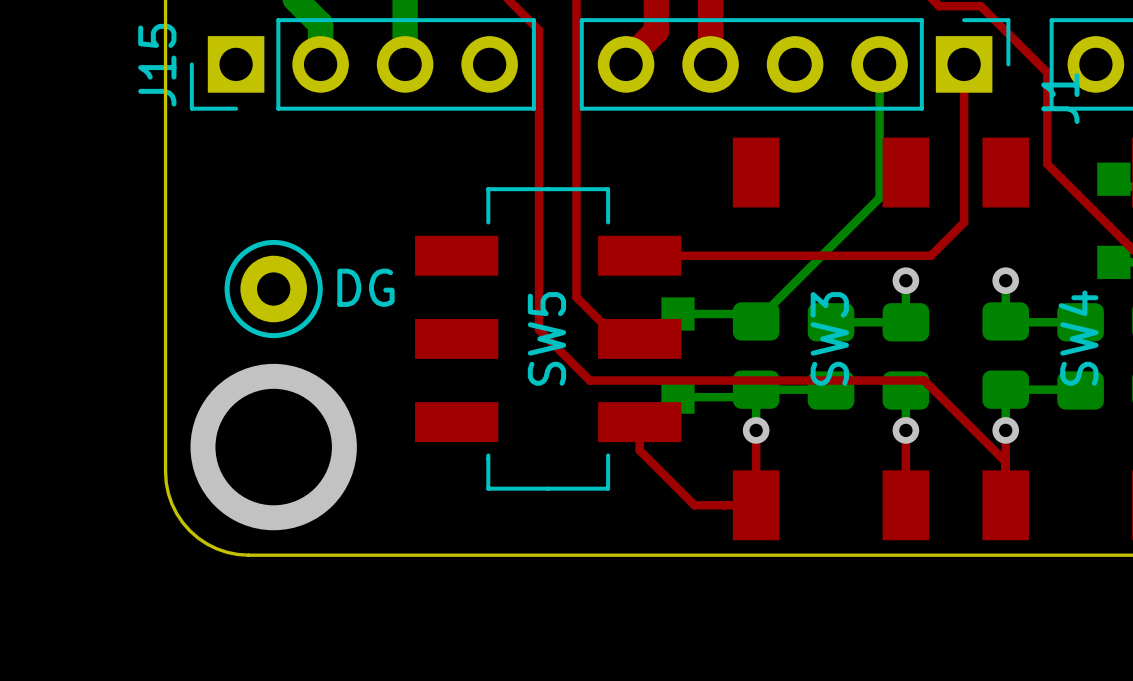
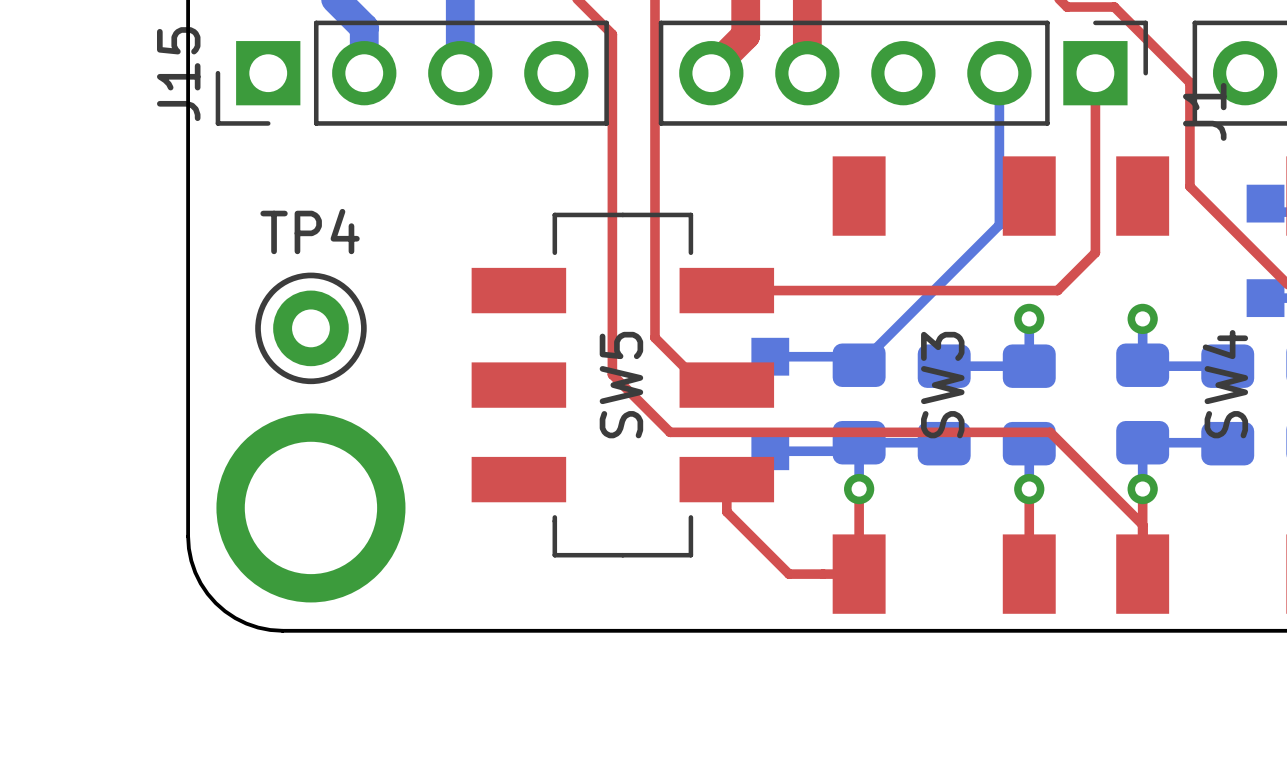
TP4 name: none -> TP4 (310, 231)
text: DG (365, 287) -> none

